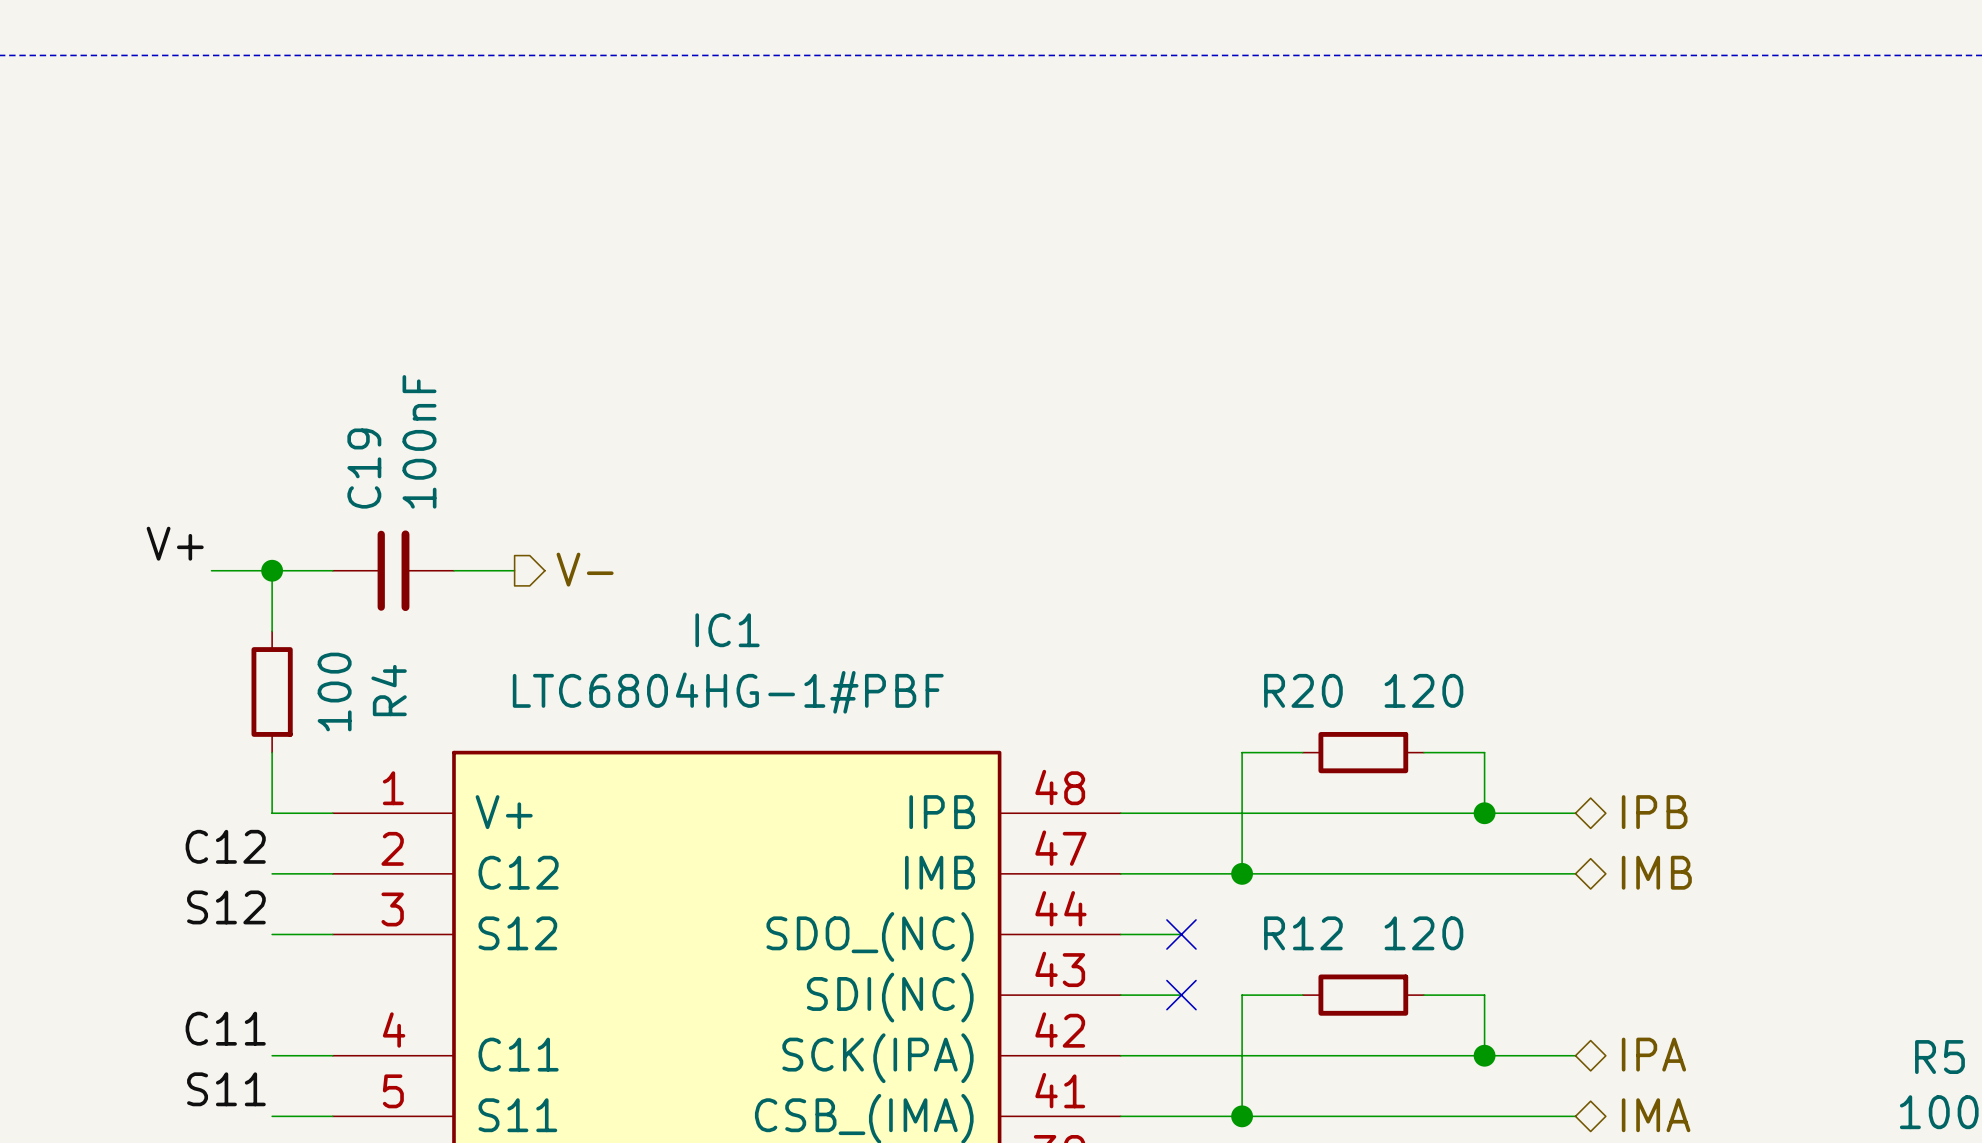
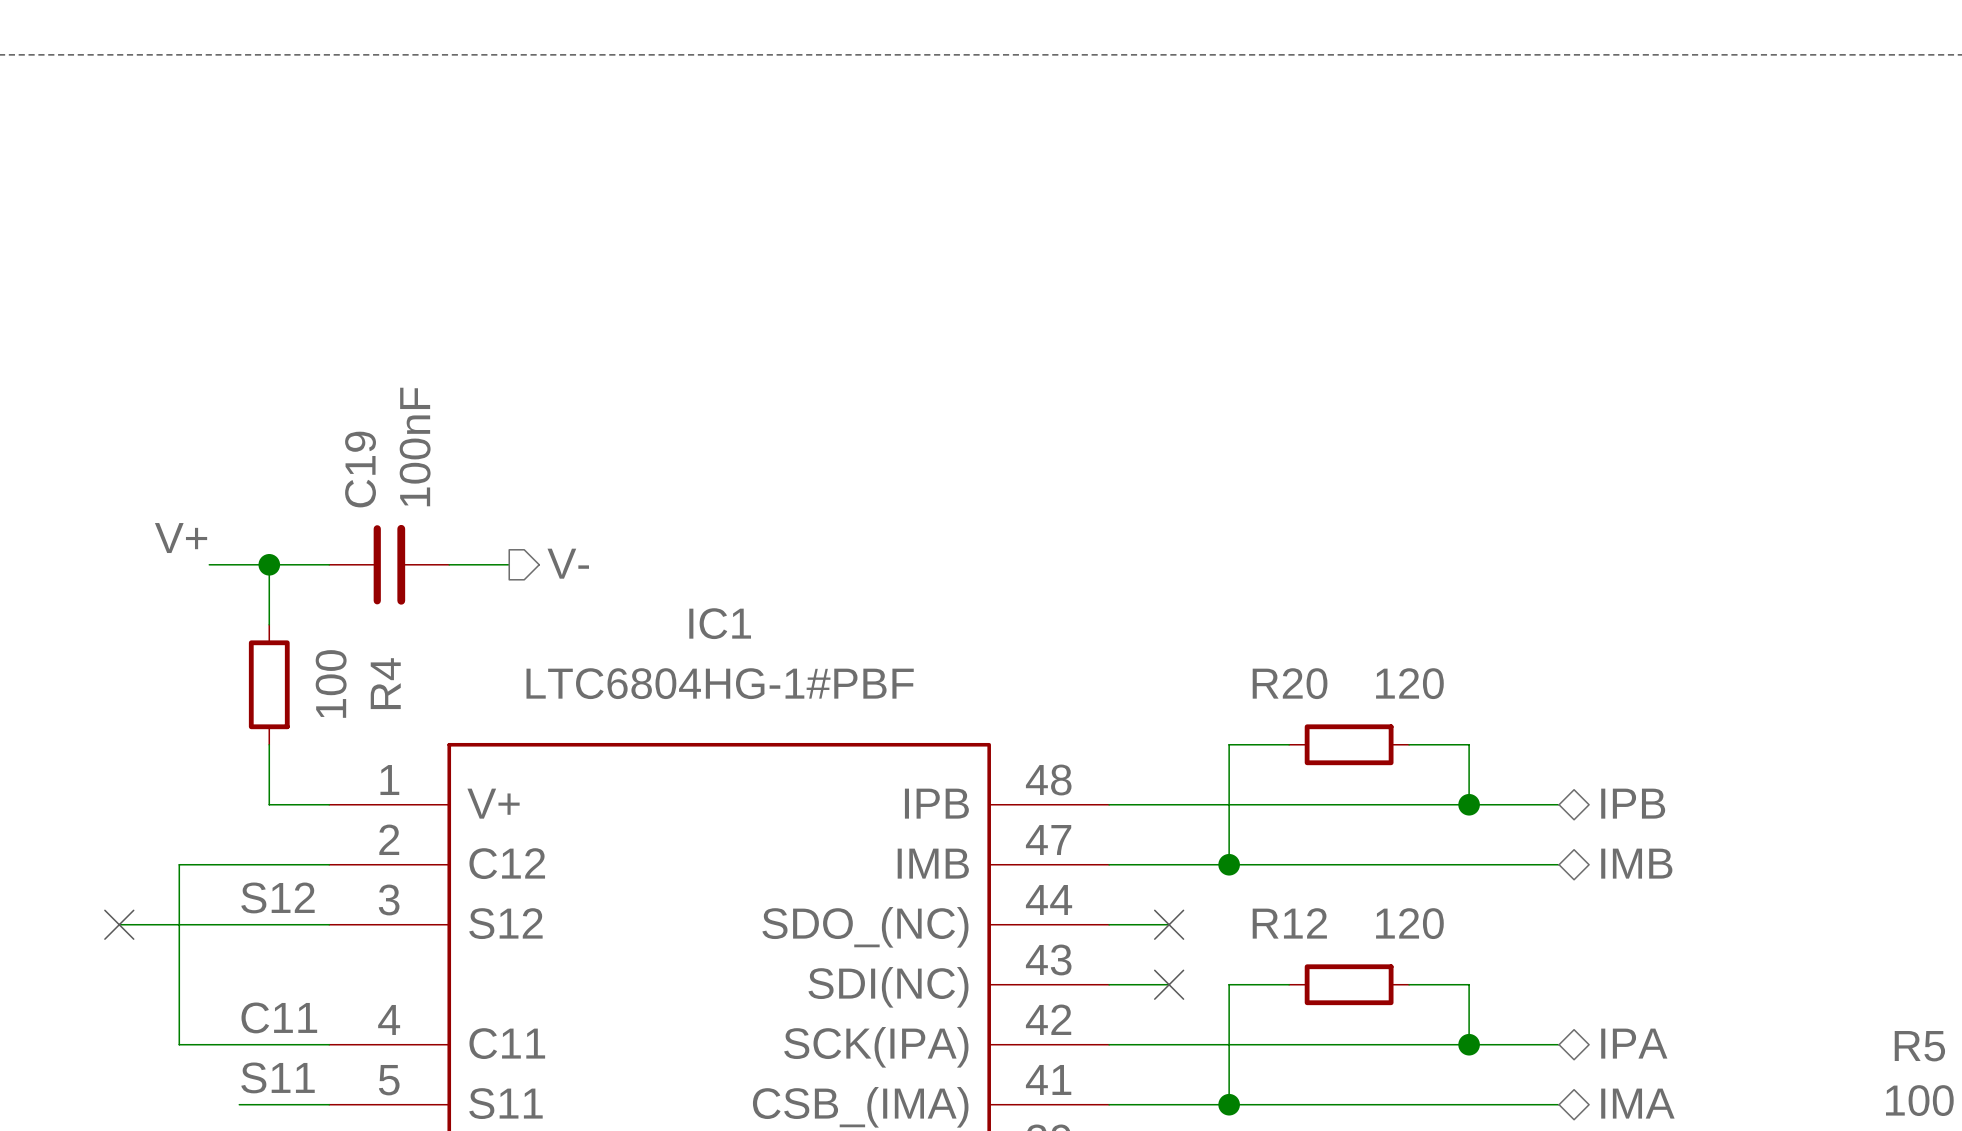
label: C12 (225, 846) -> none
wire: none -> (269, 864) (179, 864) (179, 1044) (269, 1044)
label position: S12 (226, 907) -> S12 (277, 897)
wire: none -> (119, 924) (269, 924)
no-connect mark: none -> (119, 924)
label position: C11 (225, 1028) -> C11 (279, 1017)
label position: S11 (226, 1089) -> S11 (278, 1077)
wire: none -> (239, 1104) (269, 1104)

